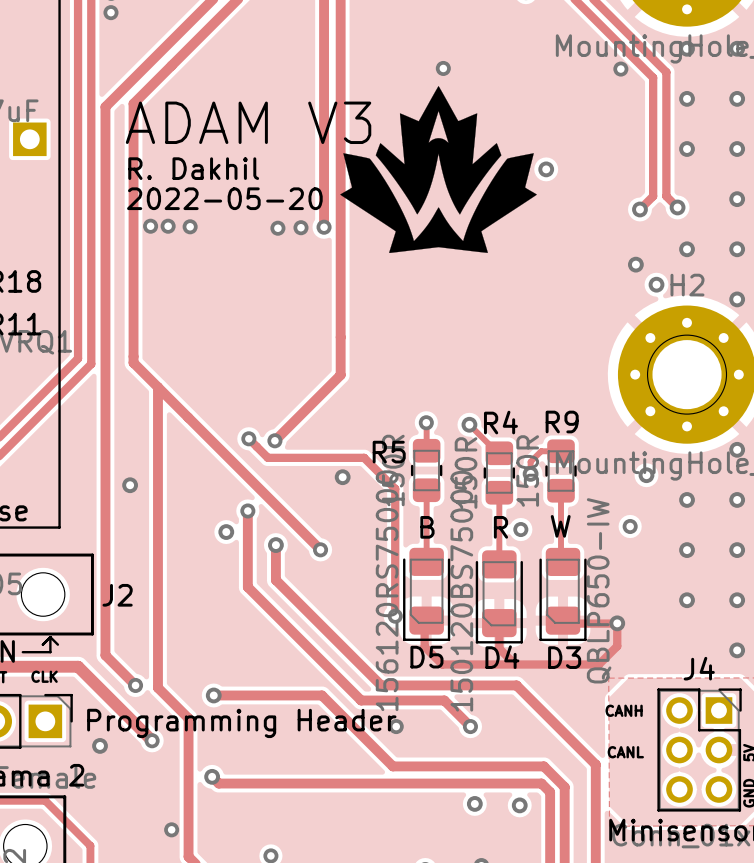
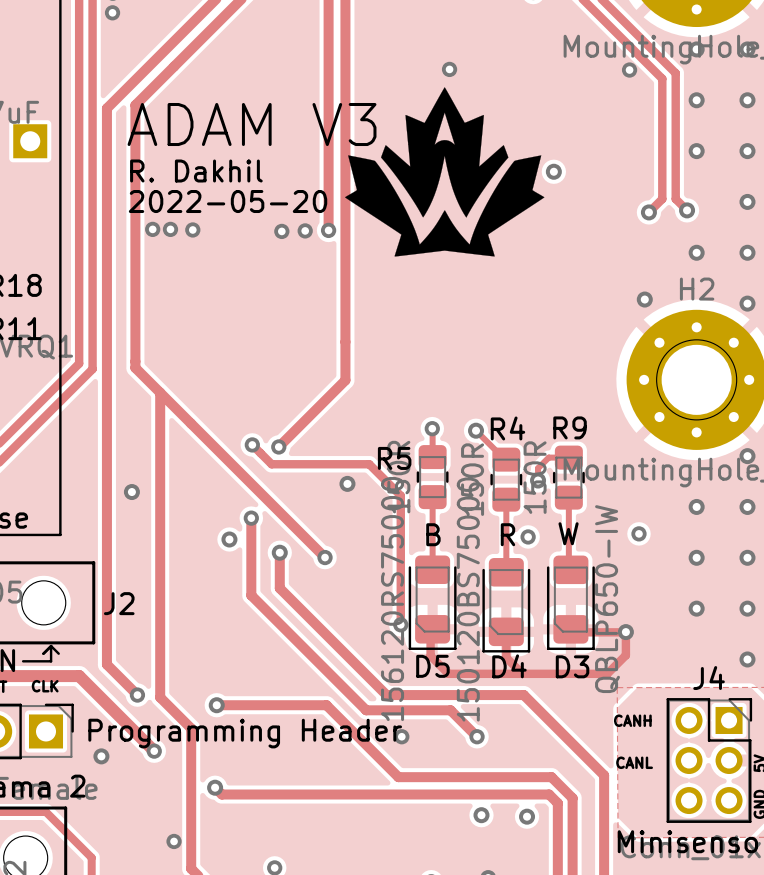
via: (635, 264) -> none
via: (656, 284) -> none
via: none -> (644, 299)
via: (646, 475) -> none

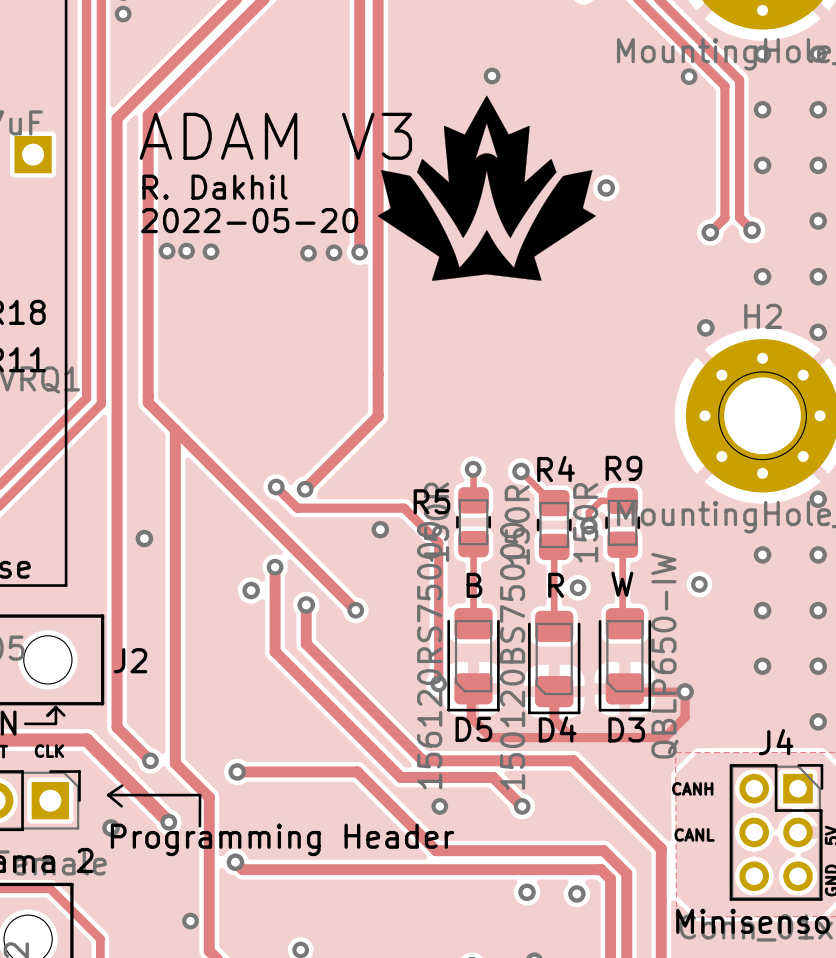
line: none -> (122, 785) (108, 795)
line: none -> (108, 795) (200, 795) (199, 826)
line: none -> (108, 795) (121, 806)
text position: Programming Header (245, 733) -> Programming Header (282, 839)

